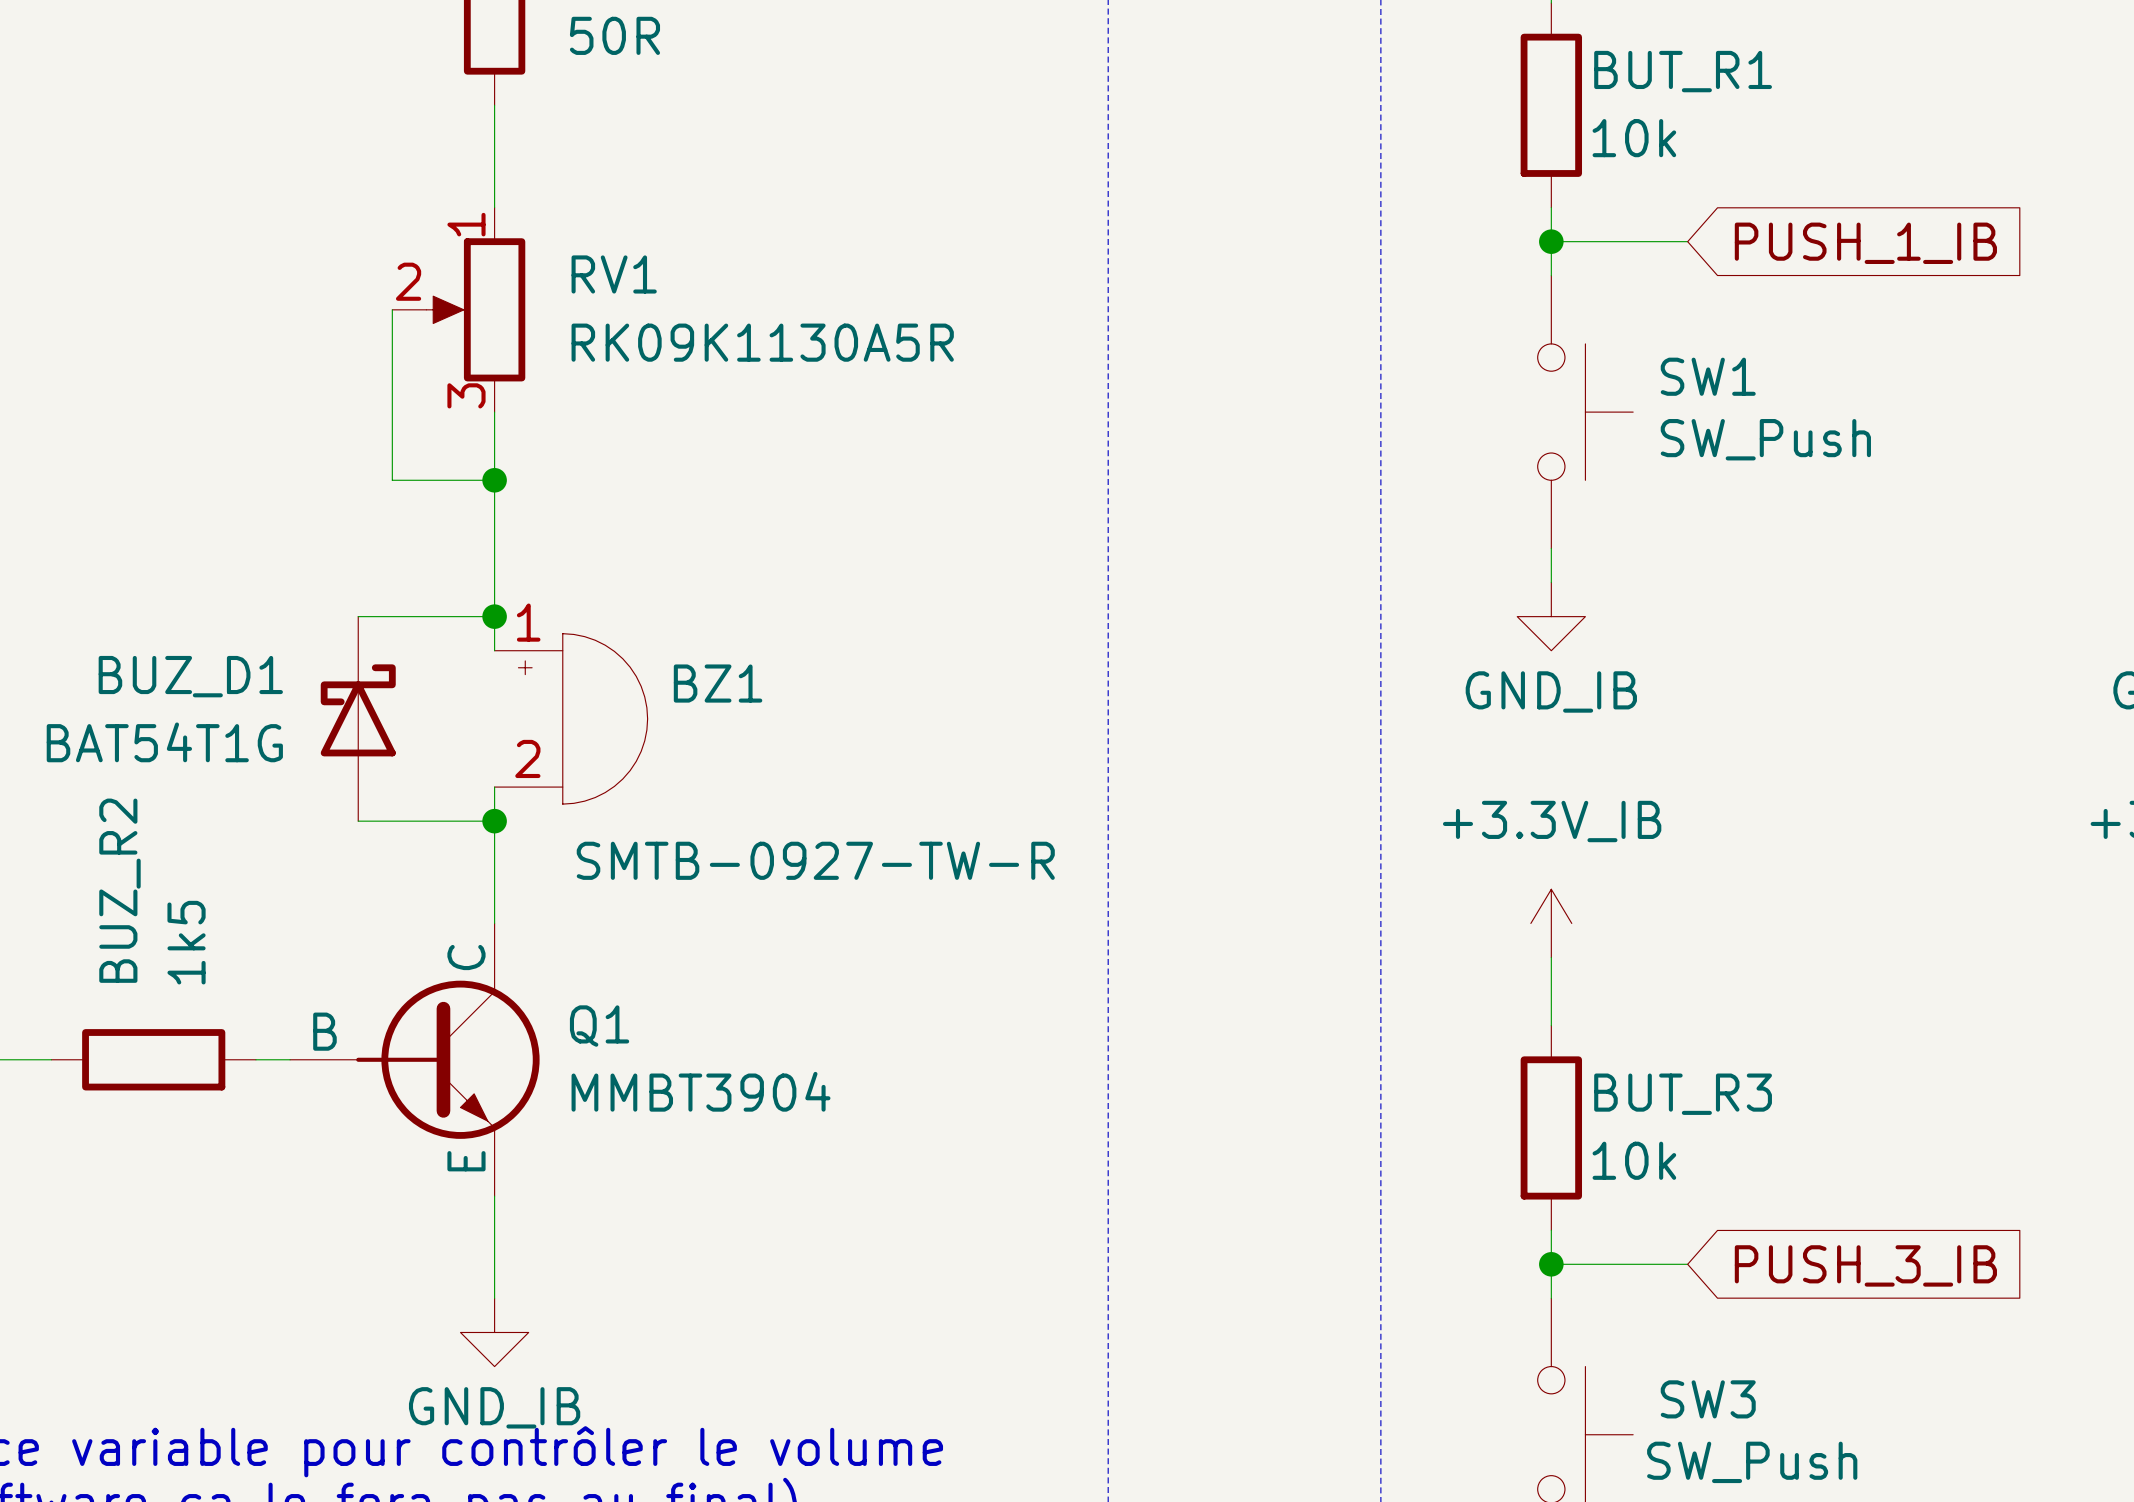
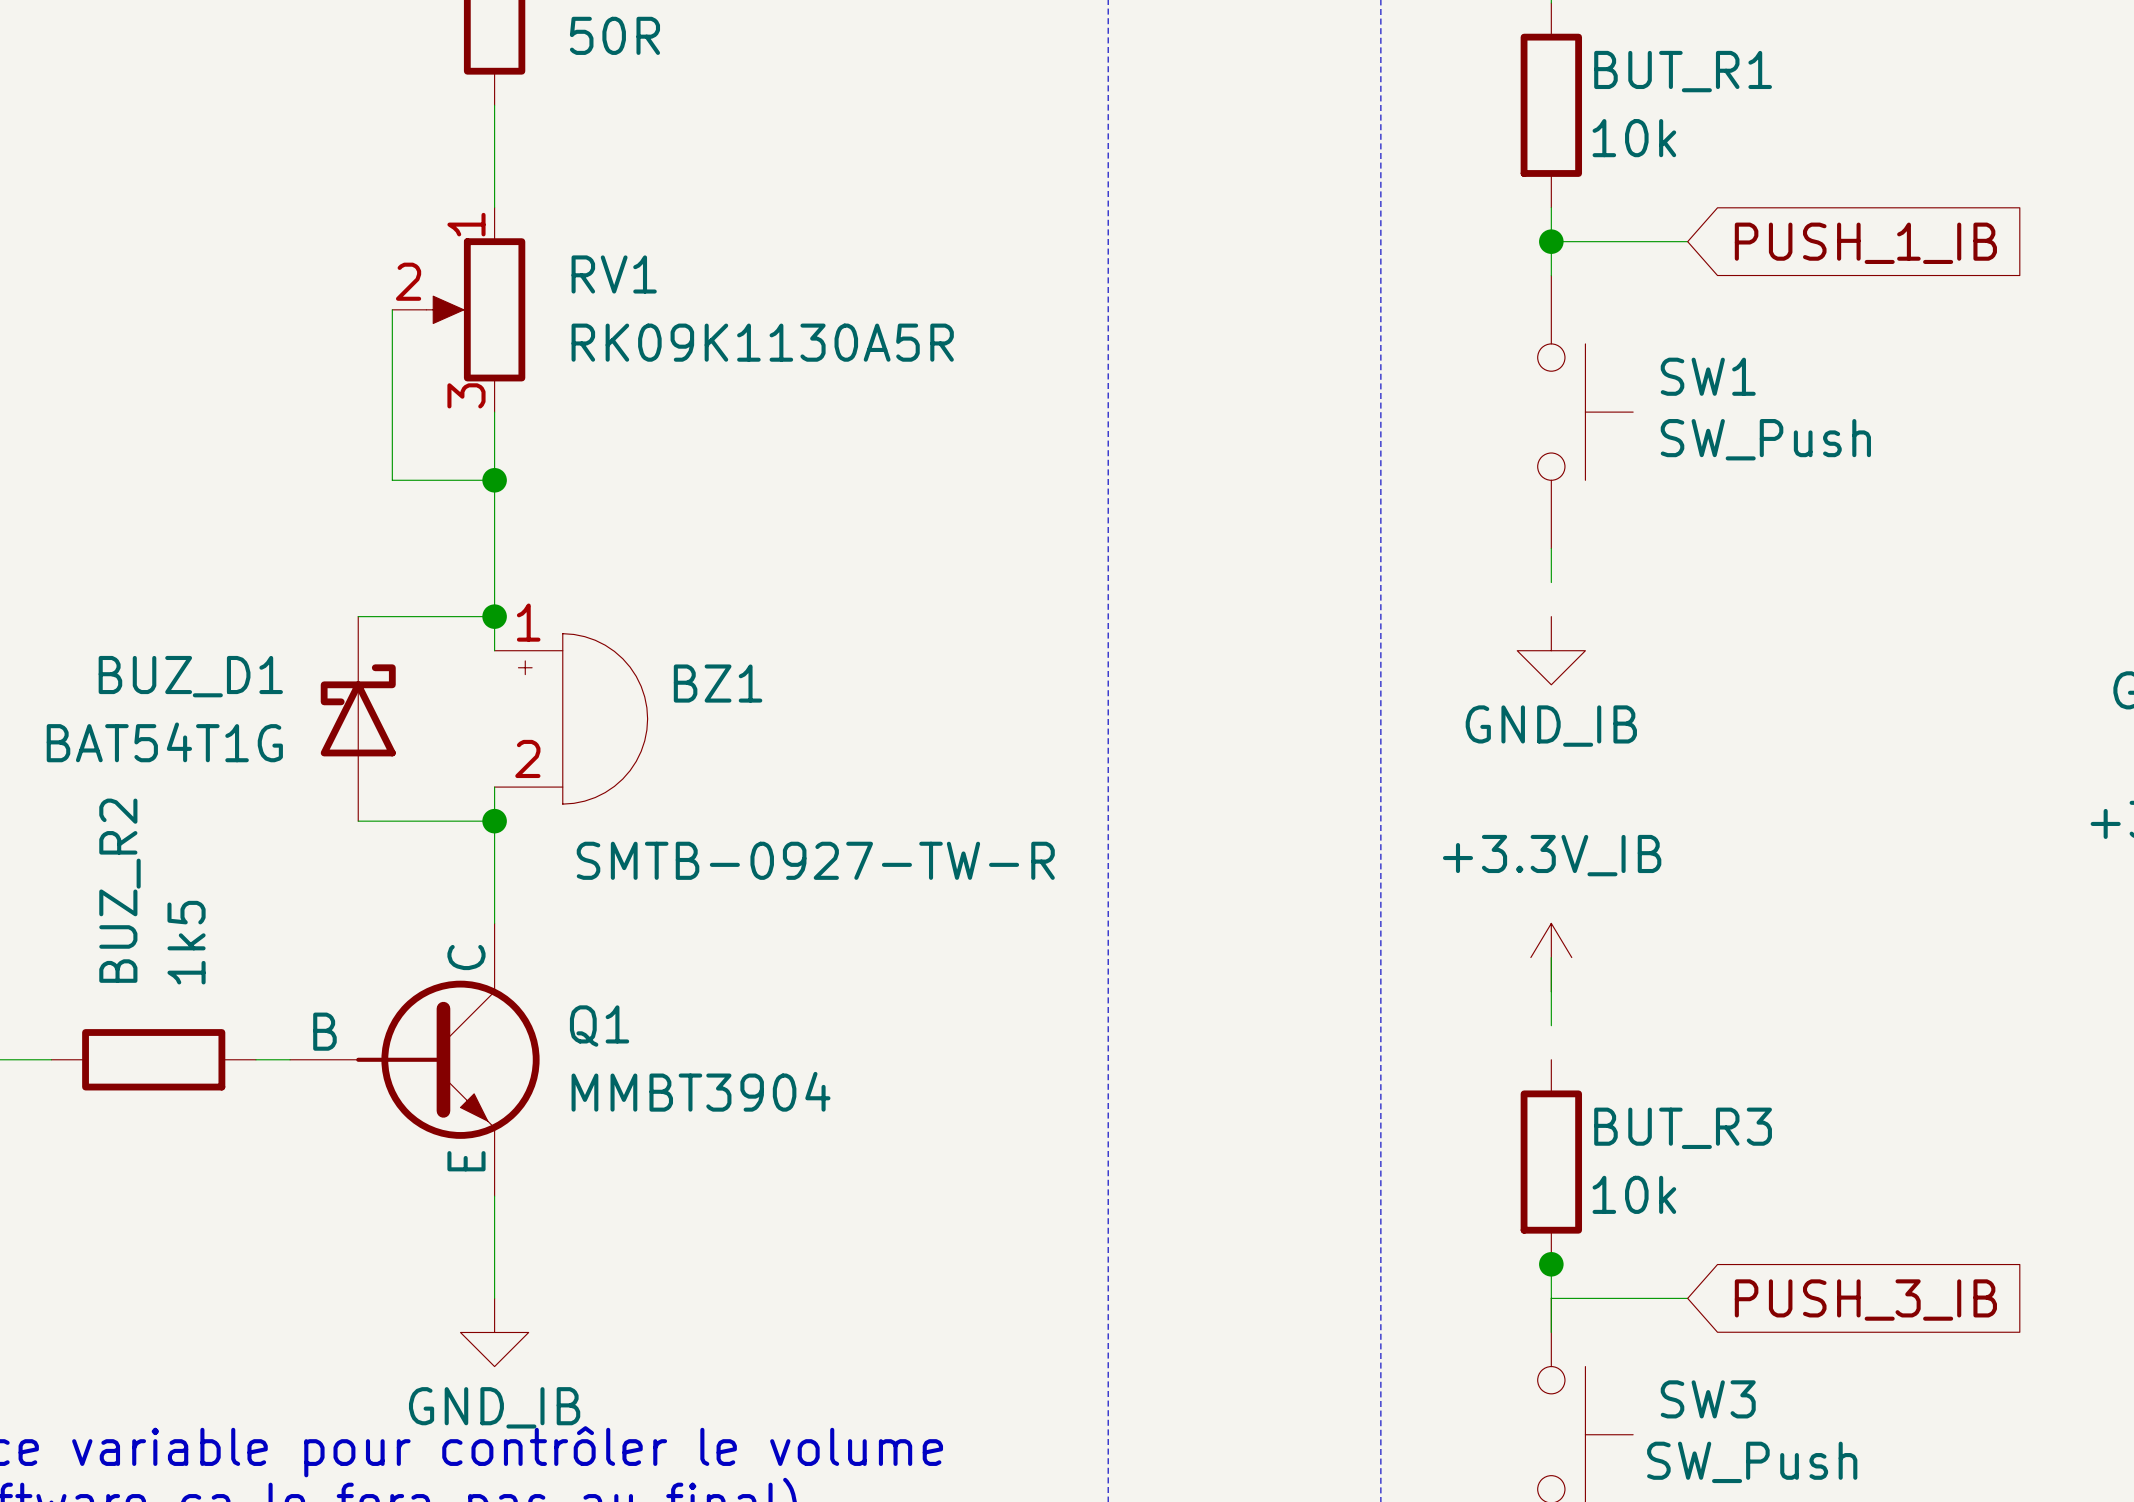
power symbol position: GND_IB (1551, 616) -> GND_IB (1551, 650)
power symbol position: +3.3V_IB (1551, 923) -> +3.3V_IB (1551, 957)
BUT_R3 position: (1551, 1127) -> (1551, 1162)
wire: (1551, 1230) (1551, 1264) (1687, 1264) -> none
global label position: PUSH_3_IB (1865, 1265) -> PUSH_3_IB (1865, 1300)
wire: none -> (1687, 1298) (1551, 1298) (1551, 1332)

